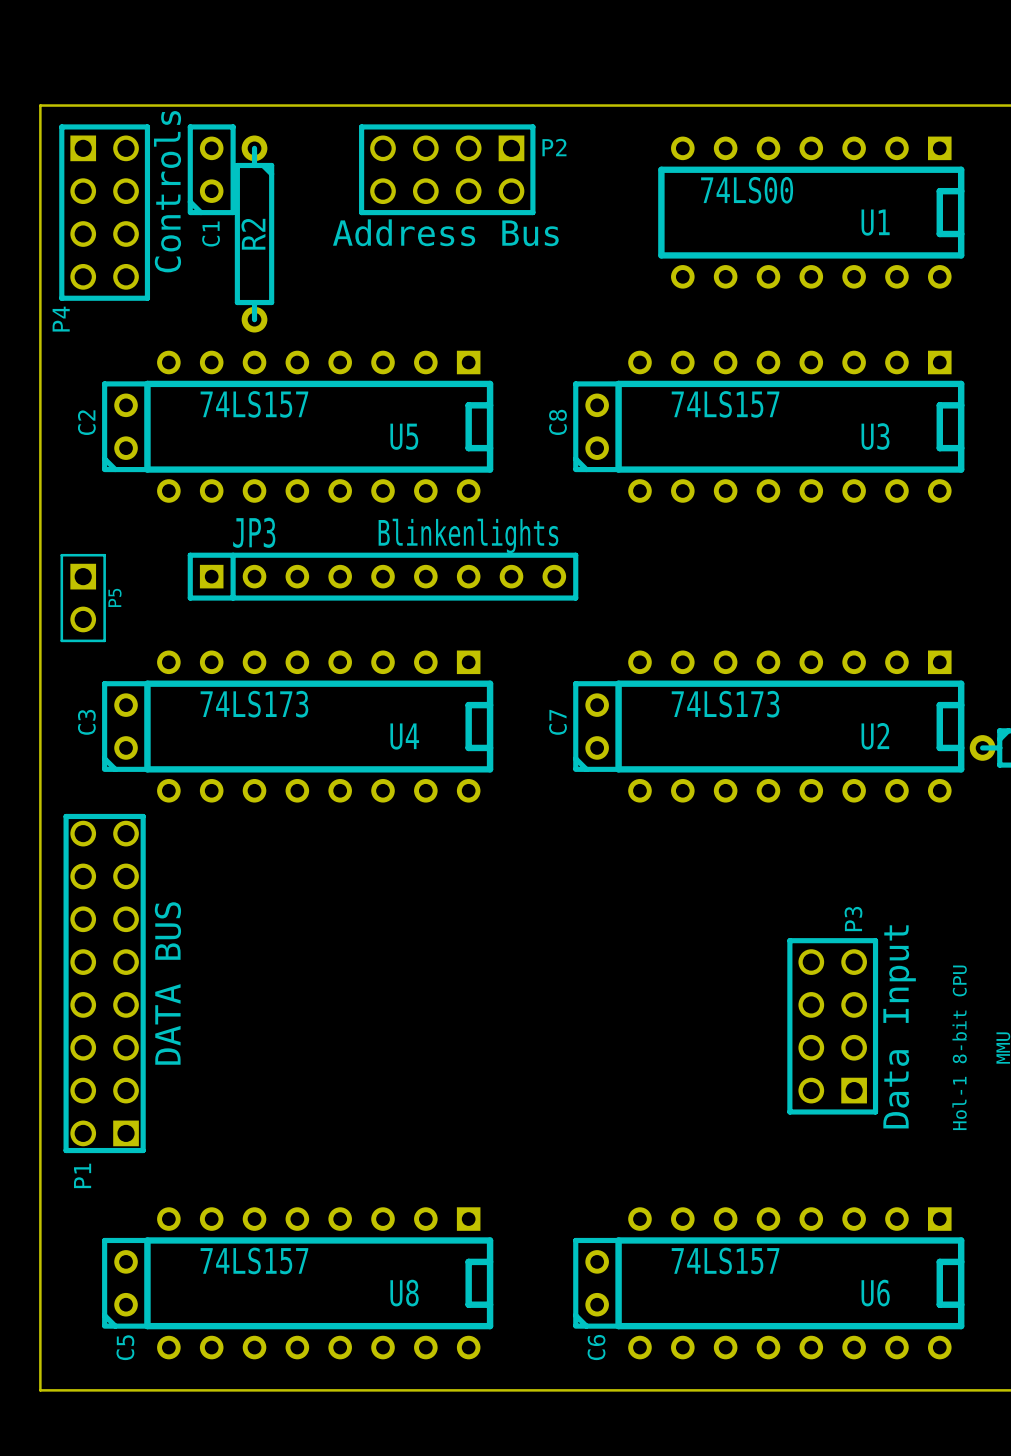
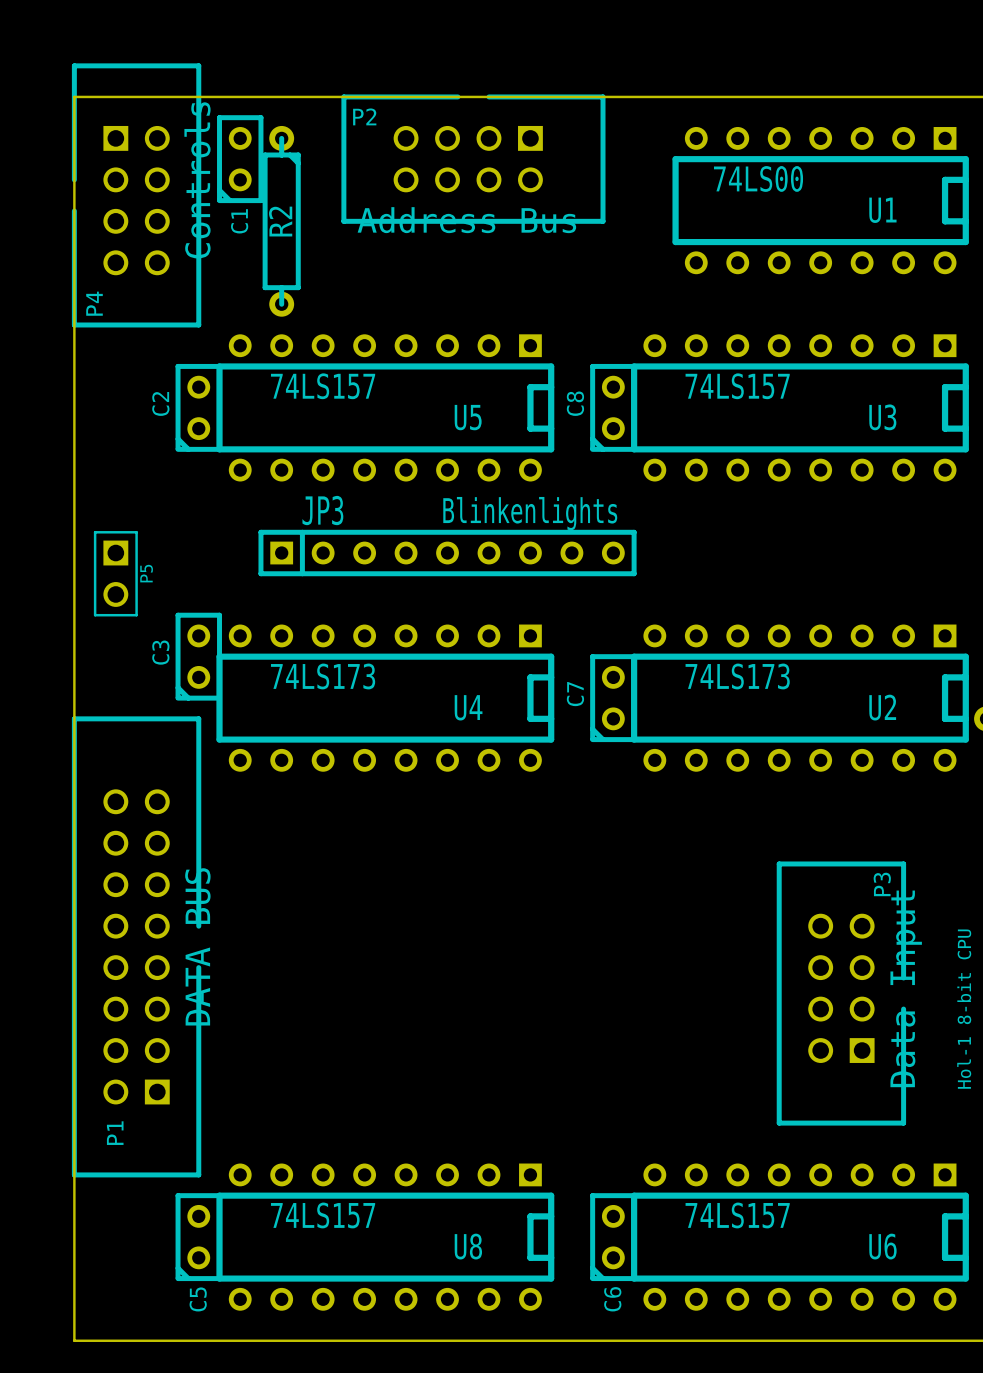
P4 footprint: [59, 124, 151, 301] -> [71, 63, 202, 328]
P2 footprint: [359, 124, 536, 216] -> [341, 94, 606, 224]
P2 name position: P2 (554, 147) -> P2 (364, 116)
C2 position: (126, 426) -> (198, 407)
U5 position: (318, 426) -> (385, 407)
JP3 position: (383, 576) -> (447, 553)
C3 position: (126, 726) -> (198, 656)
U4 position: (318, 726) -> (385, 698)
P1 footprint: [63, 813, 146, 1154] -> [71, 716, 202, 1178]
P3 footprint: [787, 938, 879, 1115] -> [776, 861, 907, 1126]
C5 position: (126, 1283) -> (198, 1237)
U8 position: (318, 1283) -> (385, 1237)

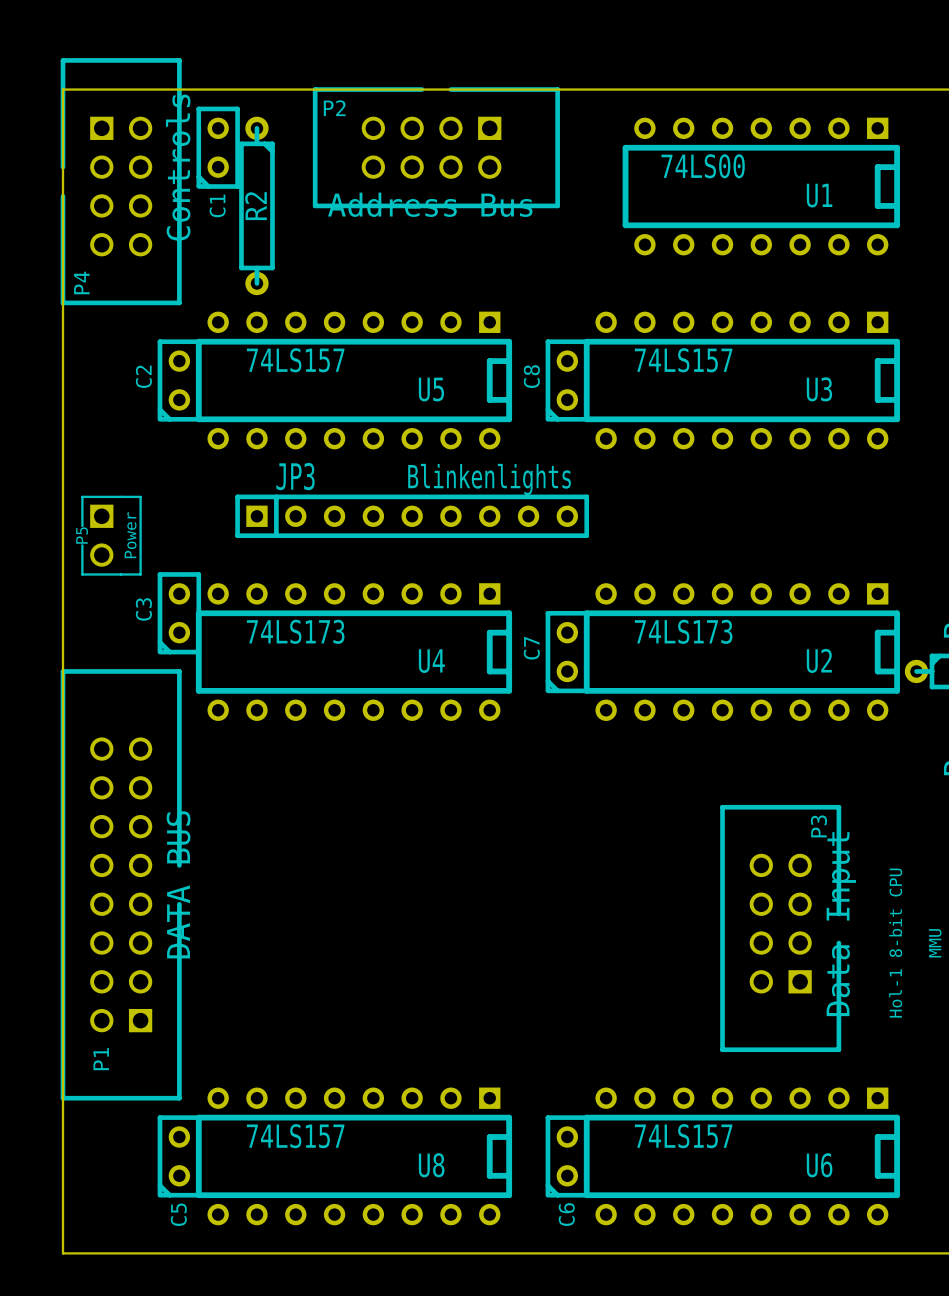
P5 footprint: [93, 531, 138, 617] -> [81, 495, 142, 576]
P5 name position: P5 (146, 573) -> P5 (82, 535)
P5 value: none -> Power (130, 535)

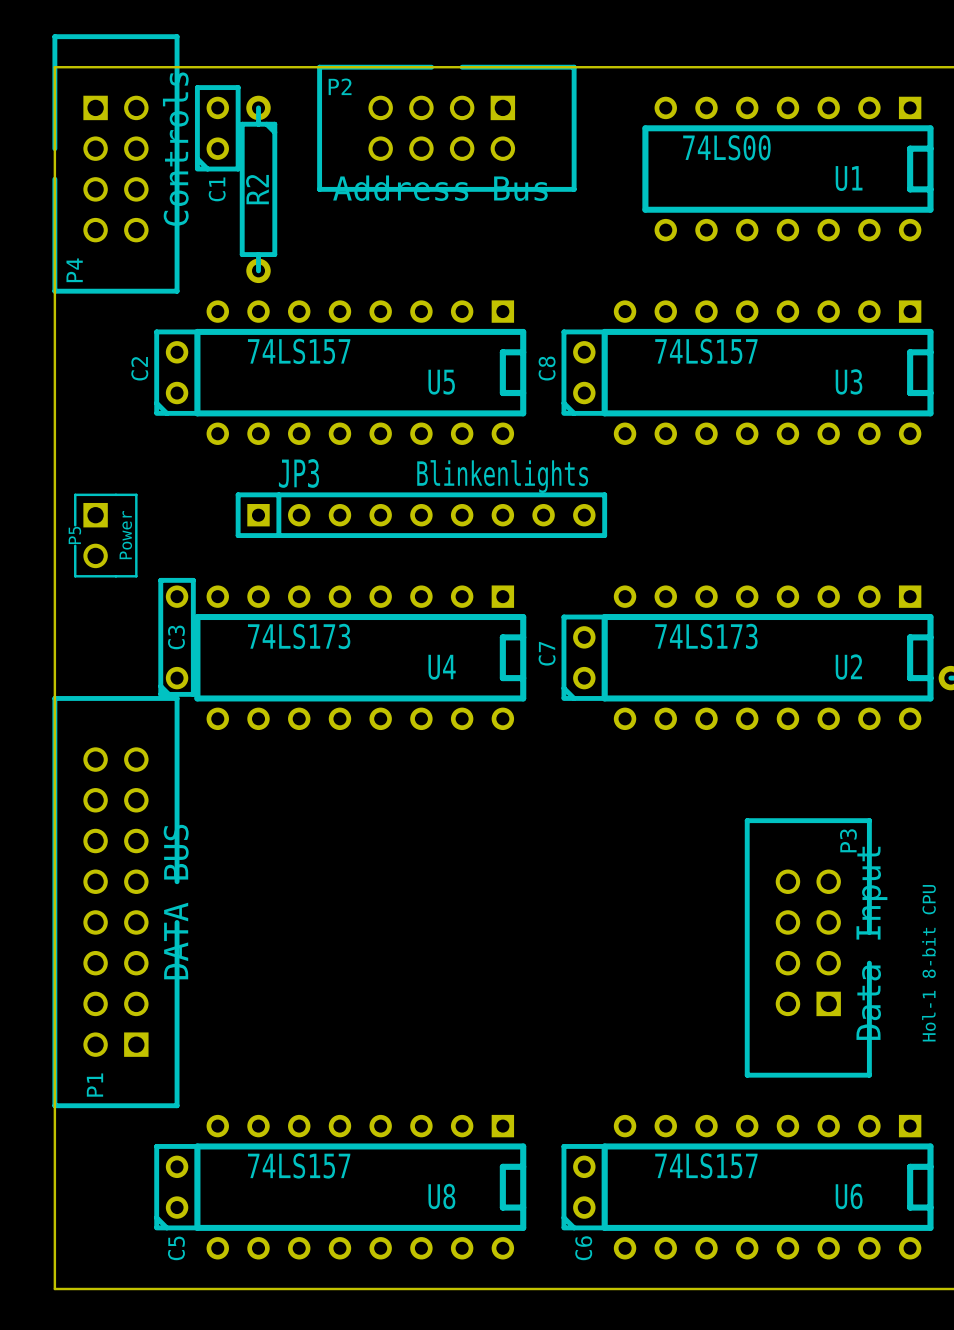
C3 footprint: [157, 572, 202, 655] -> [158, 577, 196, 697]
C3 name position: C3 (143, 609) -> C3 (176, 637)
P1 footprint: [60, 669, 182, 1101] -> [52, 696, 180, 1109]

